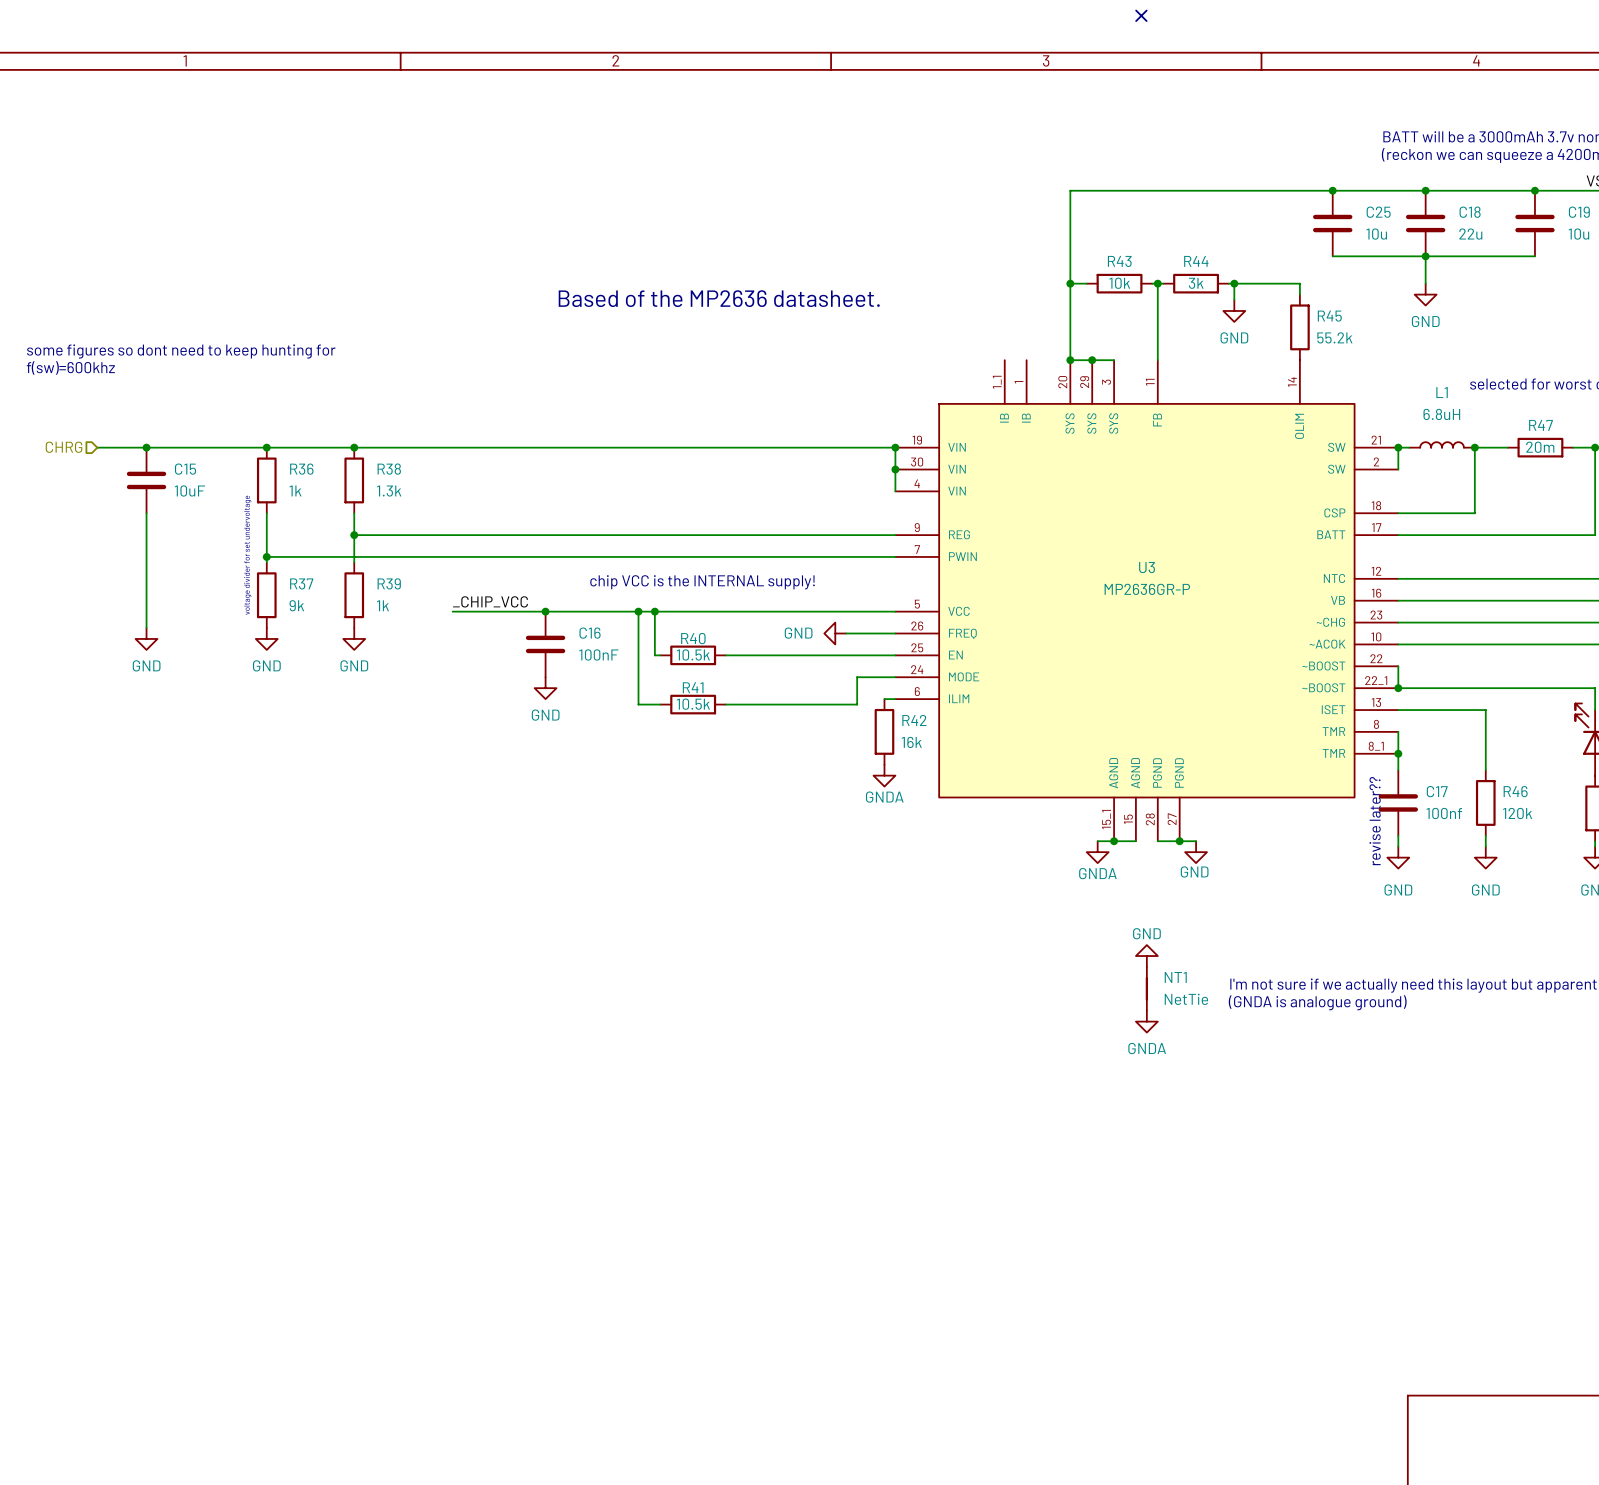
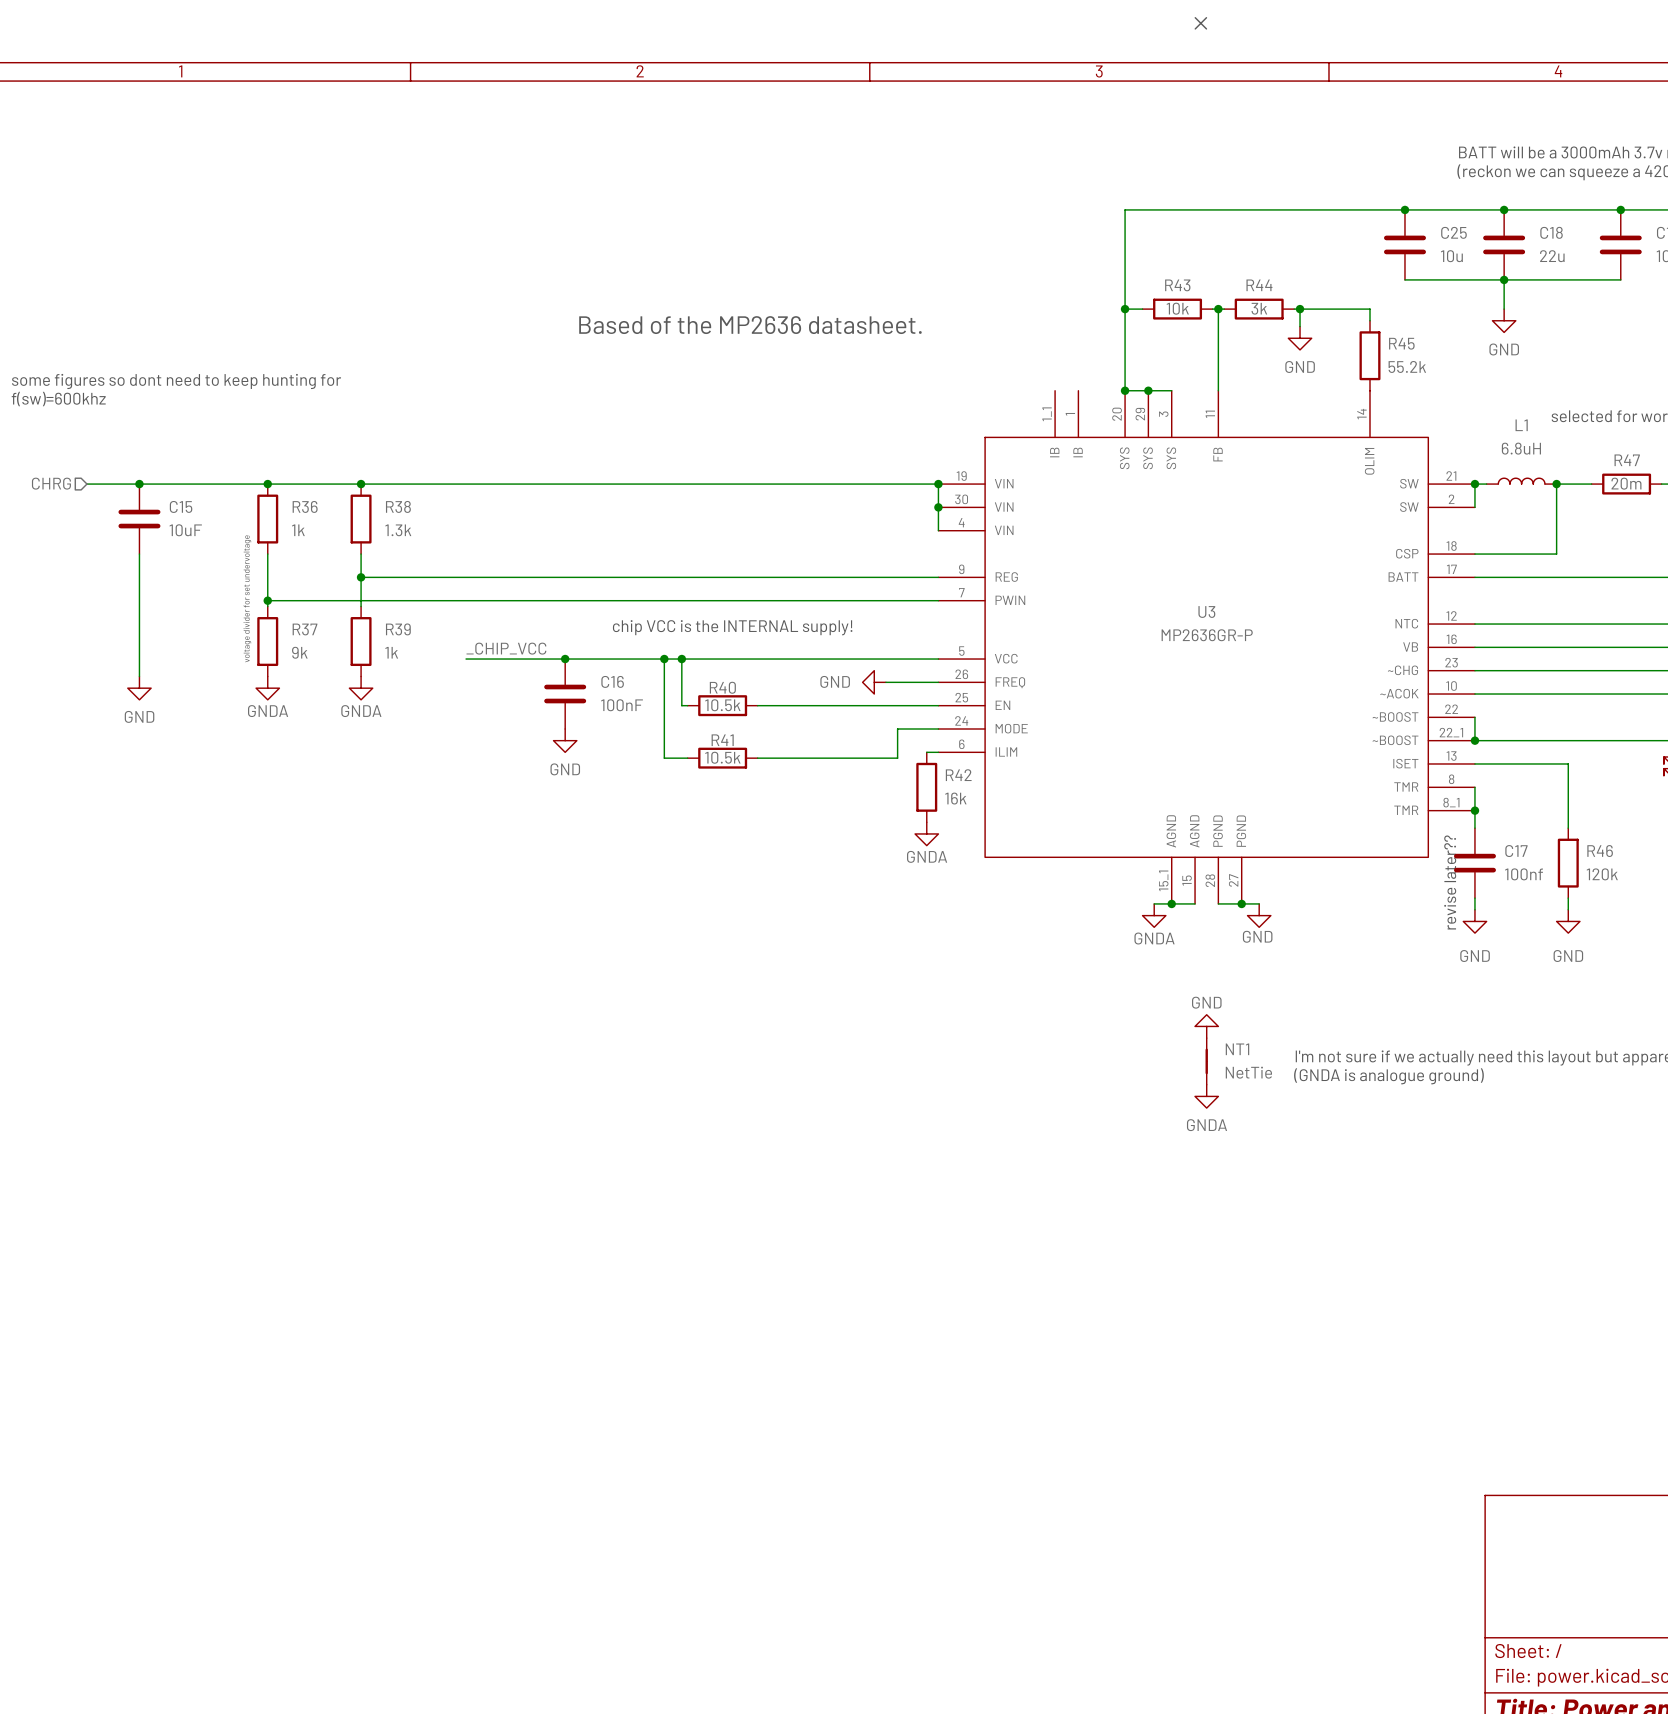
power symbol: GND (266, 638) -> GNDA (267, 688)
power symbol: GND (354, 638) -> GNDA (361, 688)

